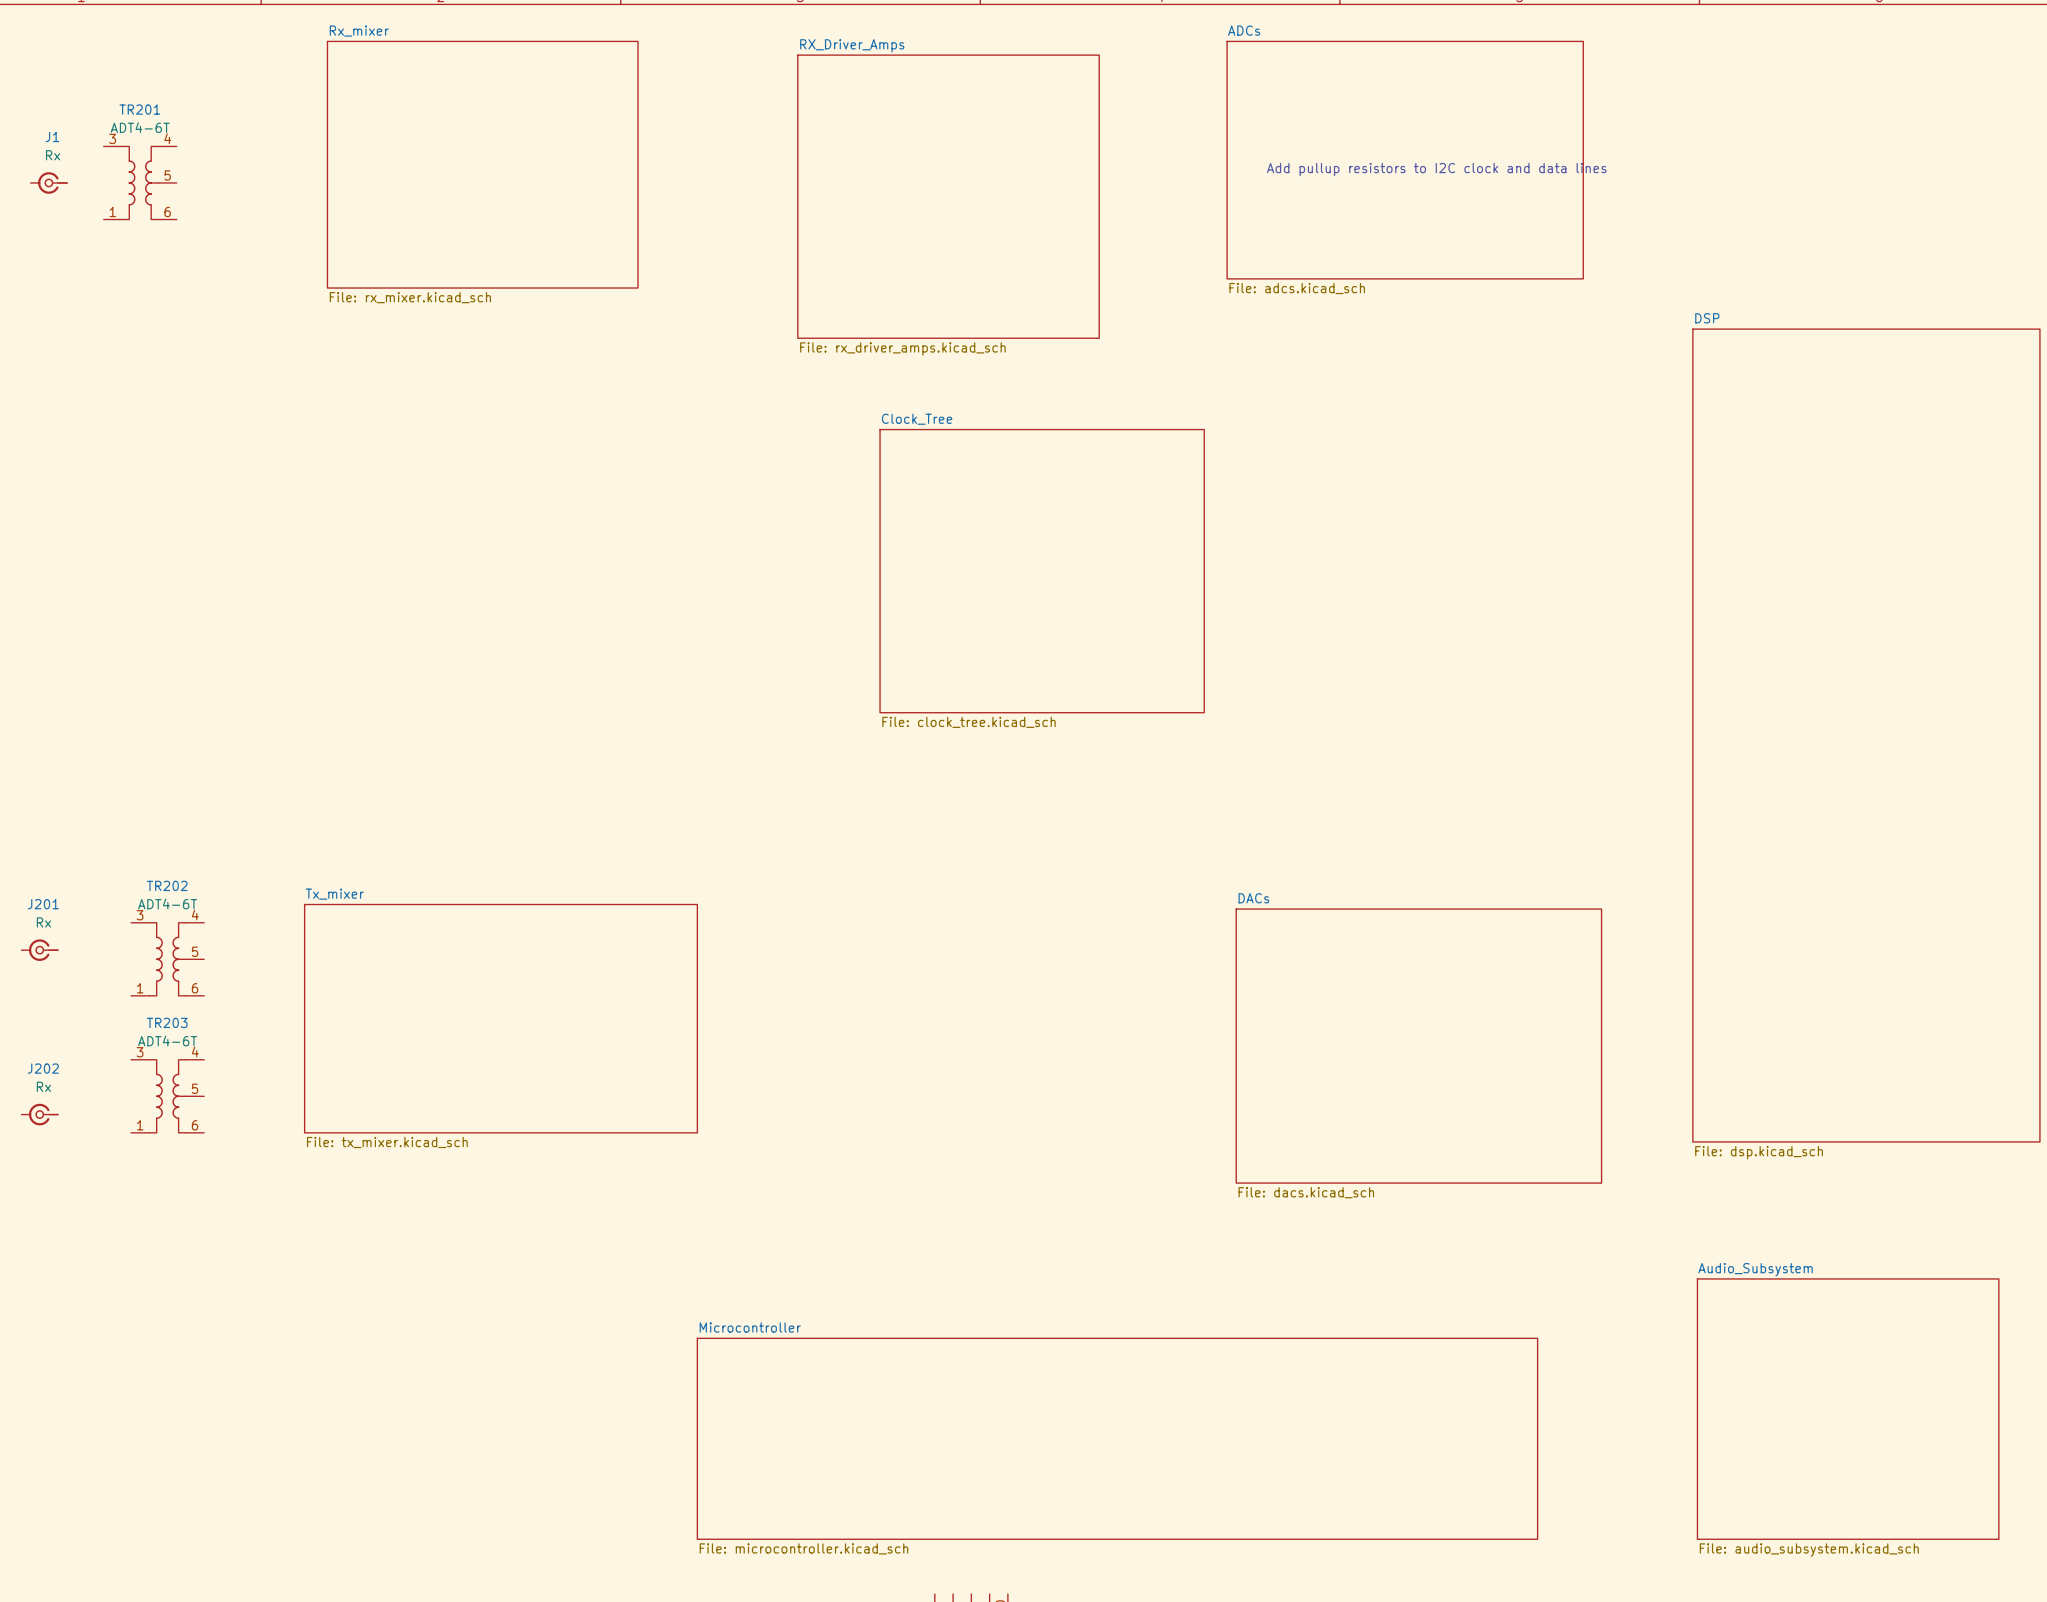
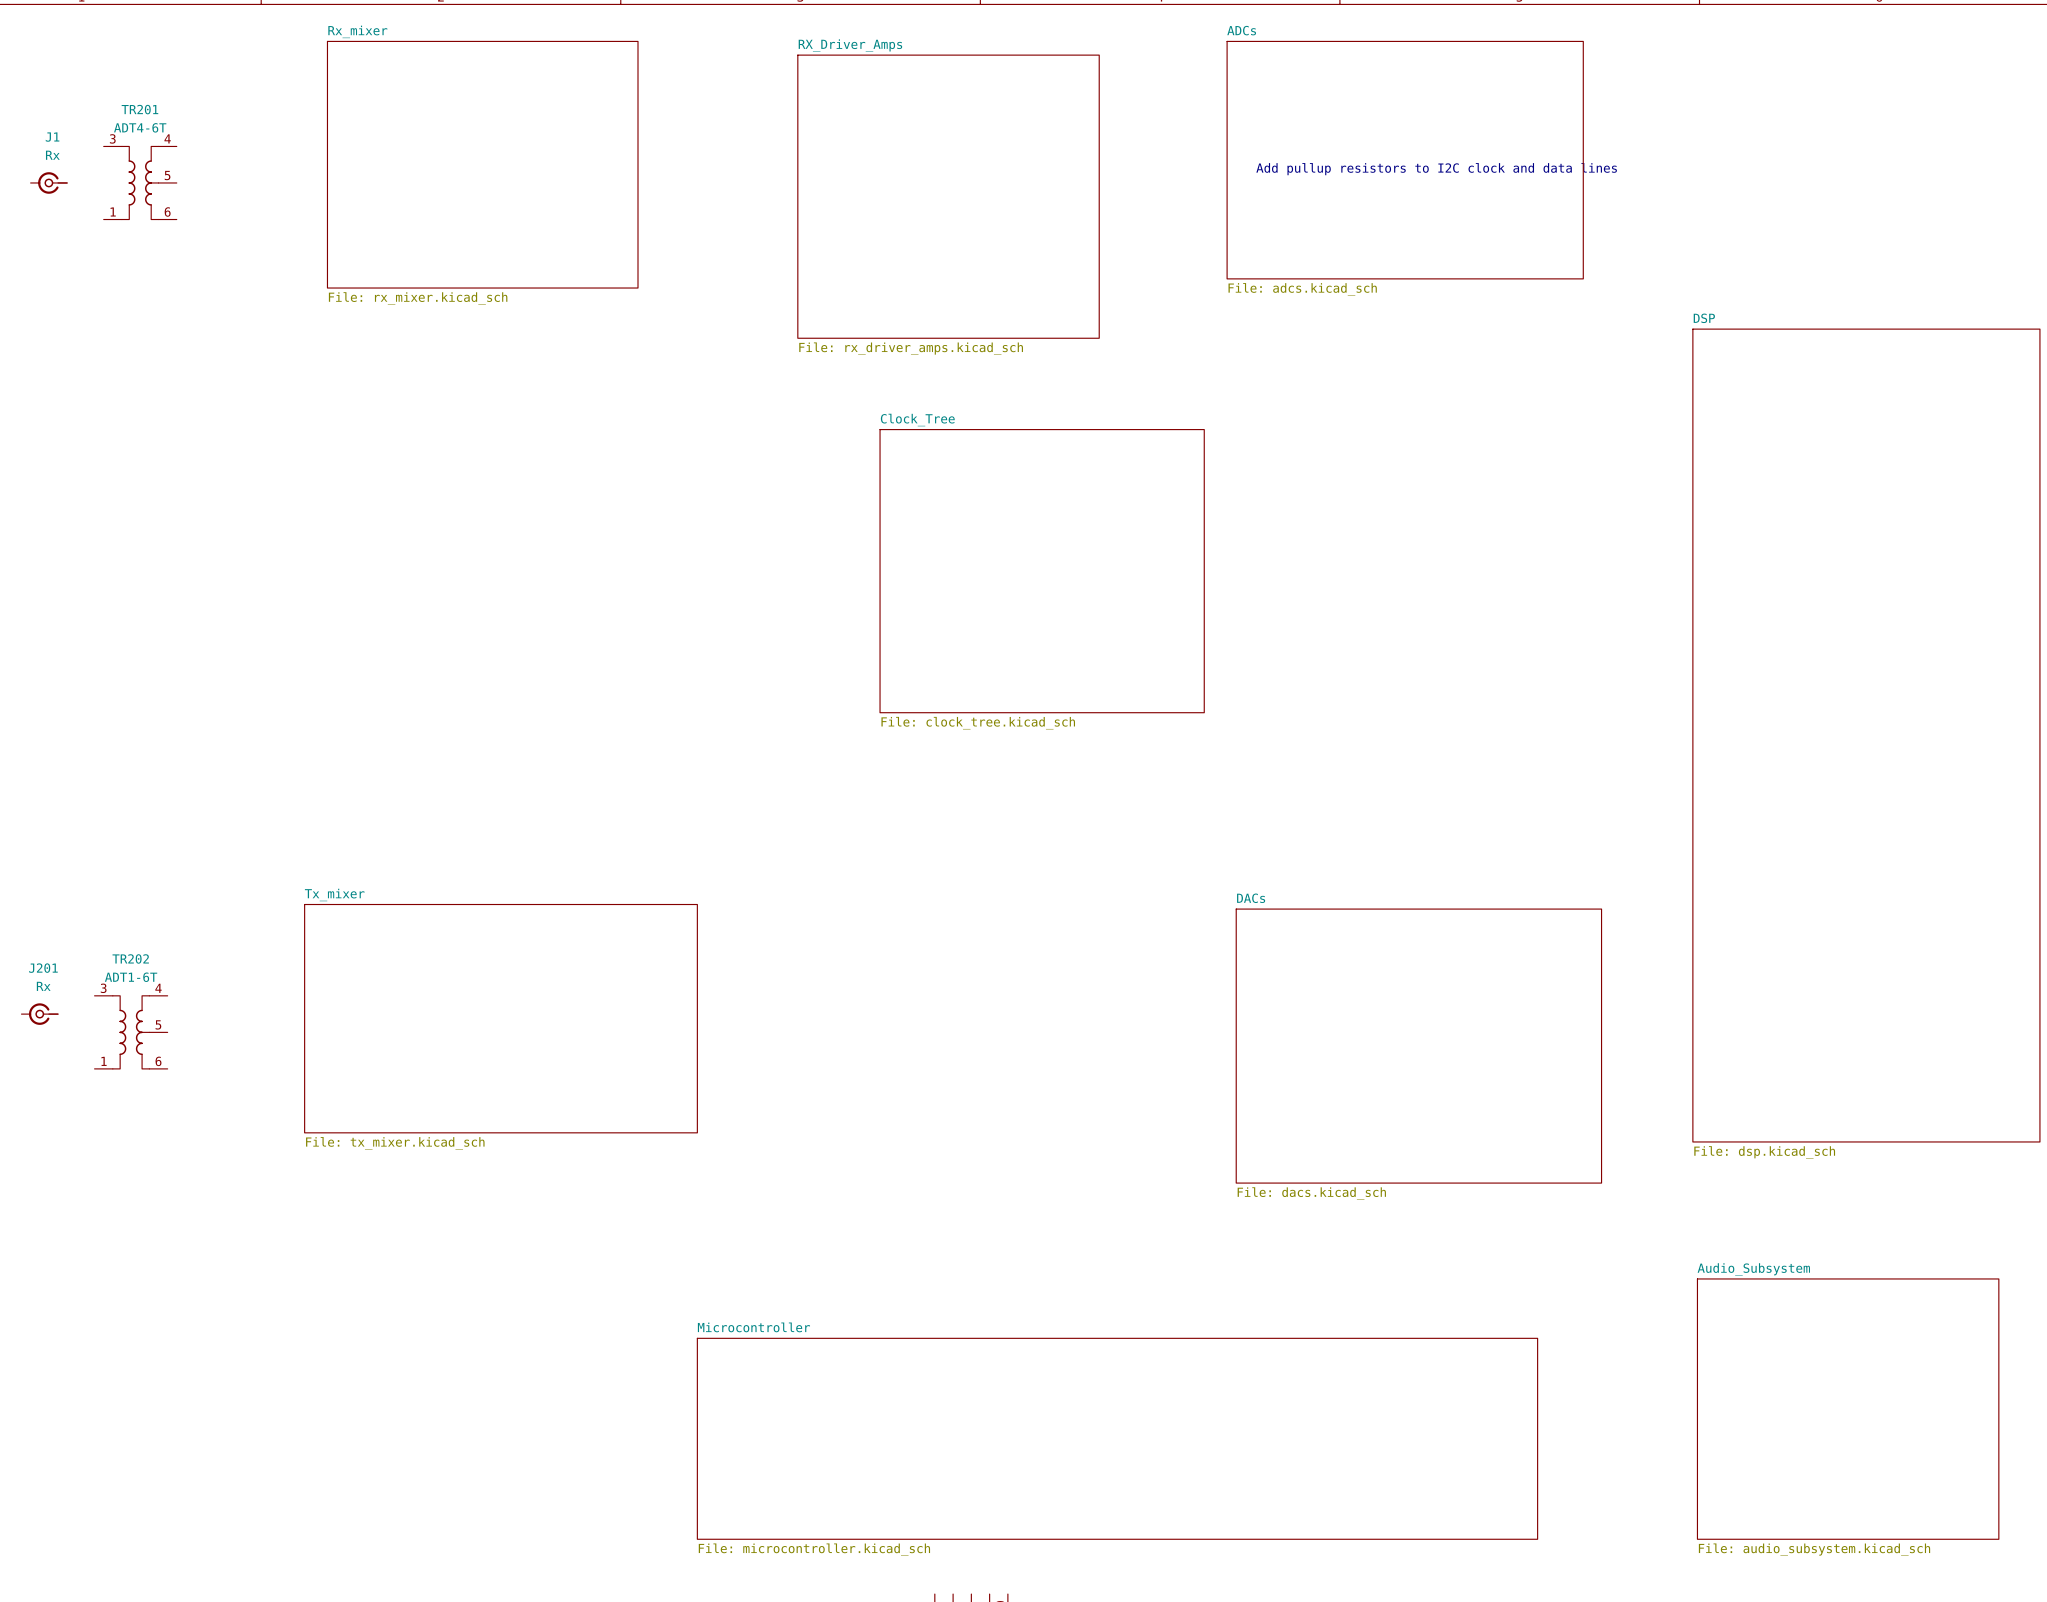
TR202 value: ADT4-6T (167, 903) -> ADT1-6T (131, 977)
J201 position: (39, 950) -> (39, 1014)
TR202 position: (167, 959) -> (131, 1032)
TR203: ADT4-6T (167, 1096) -> none
J202: Rx (39, 1114) -> none

